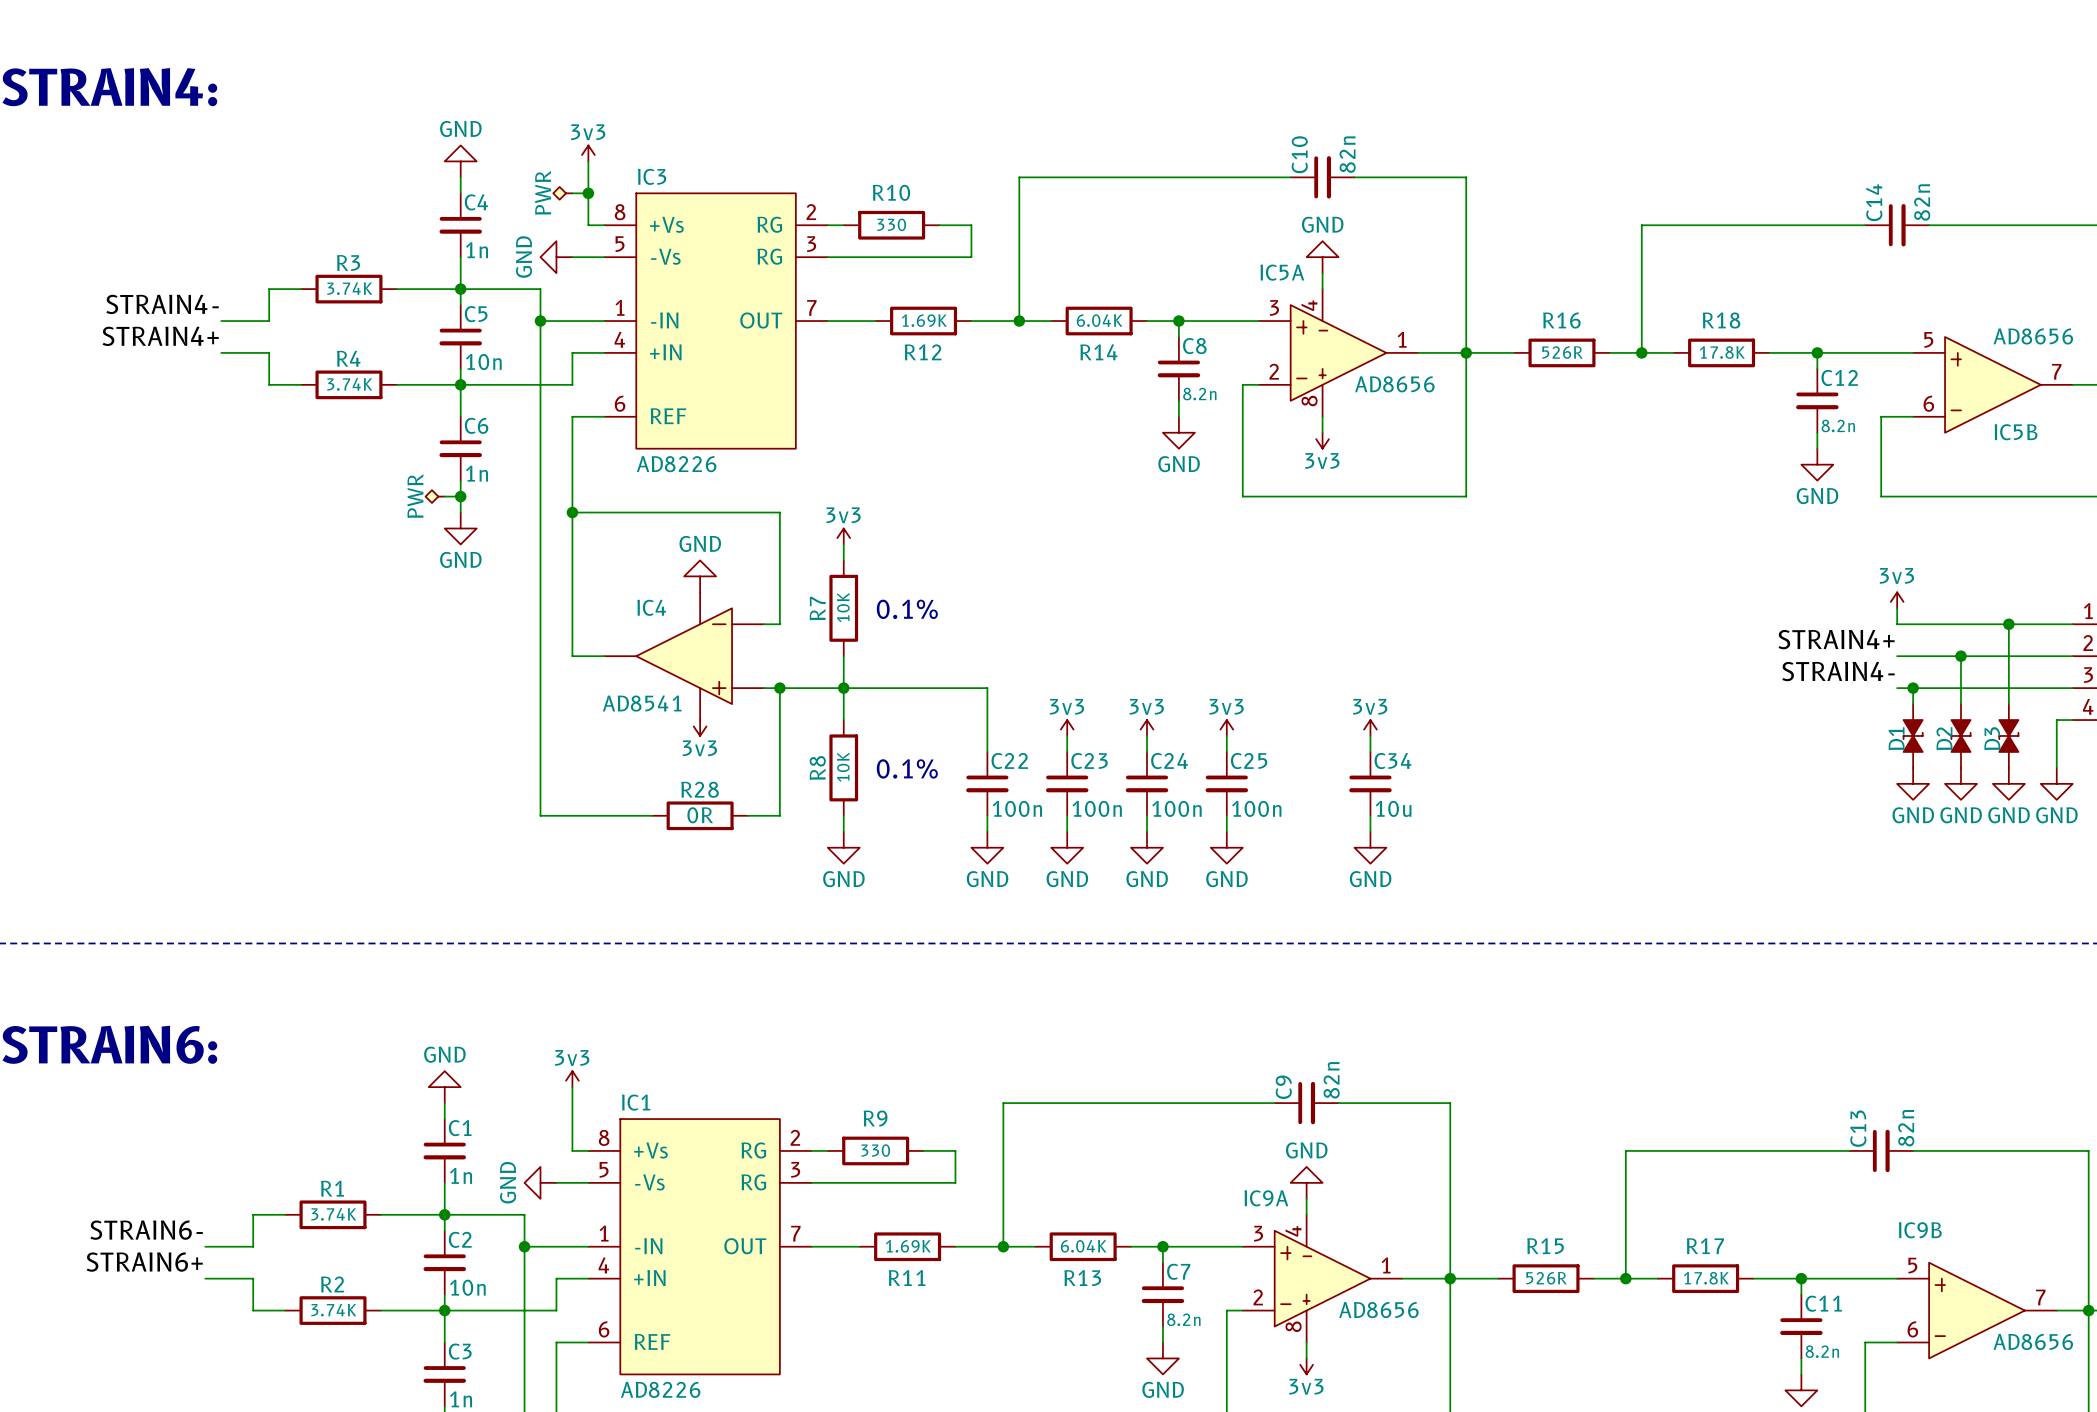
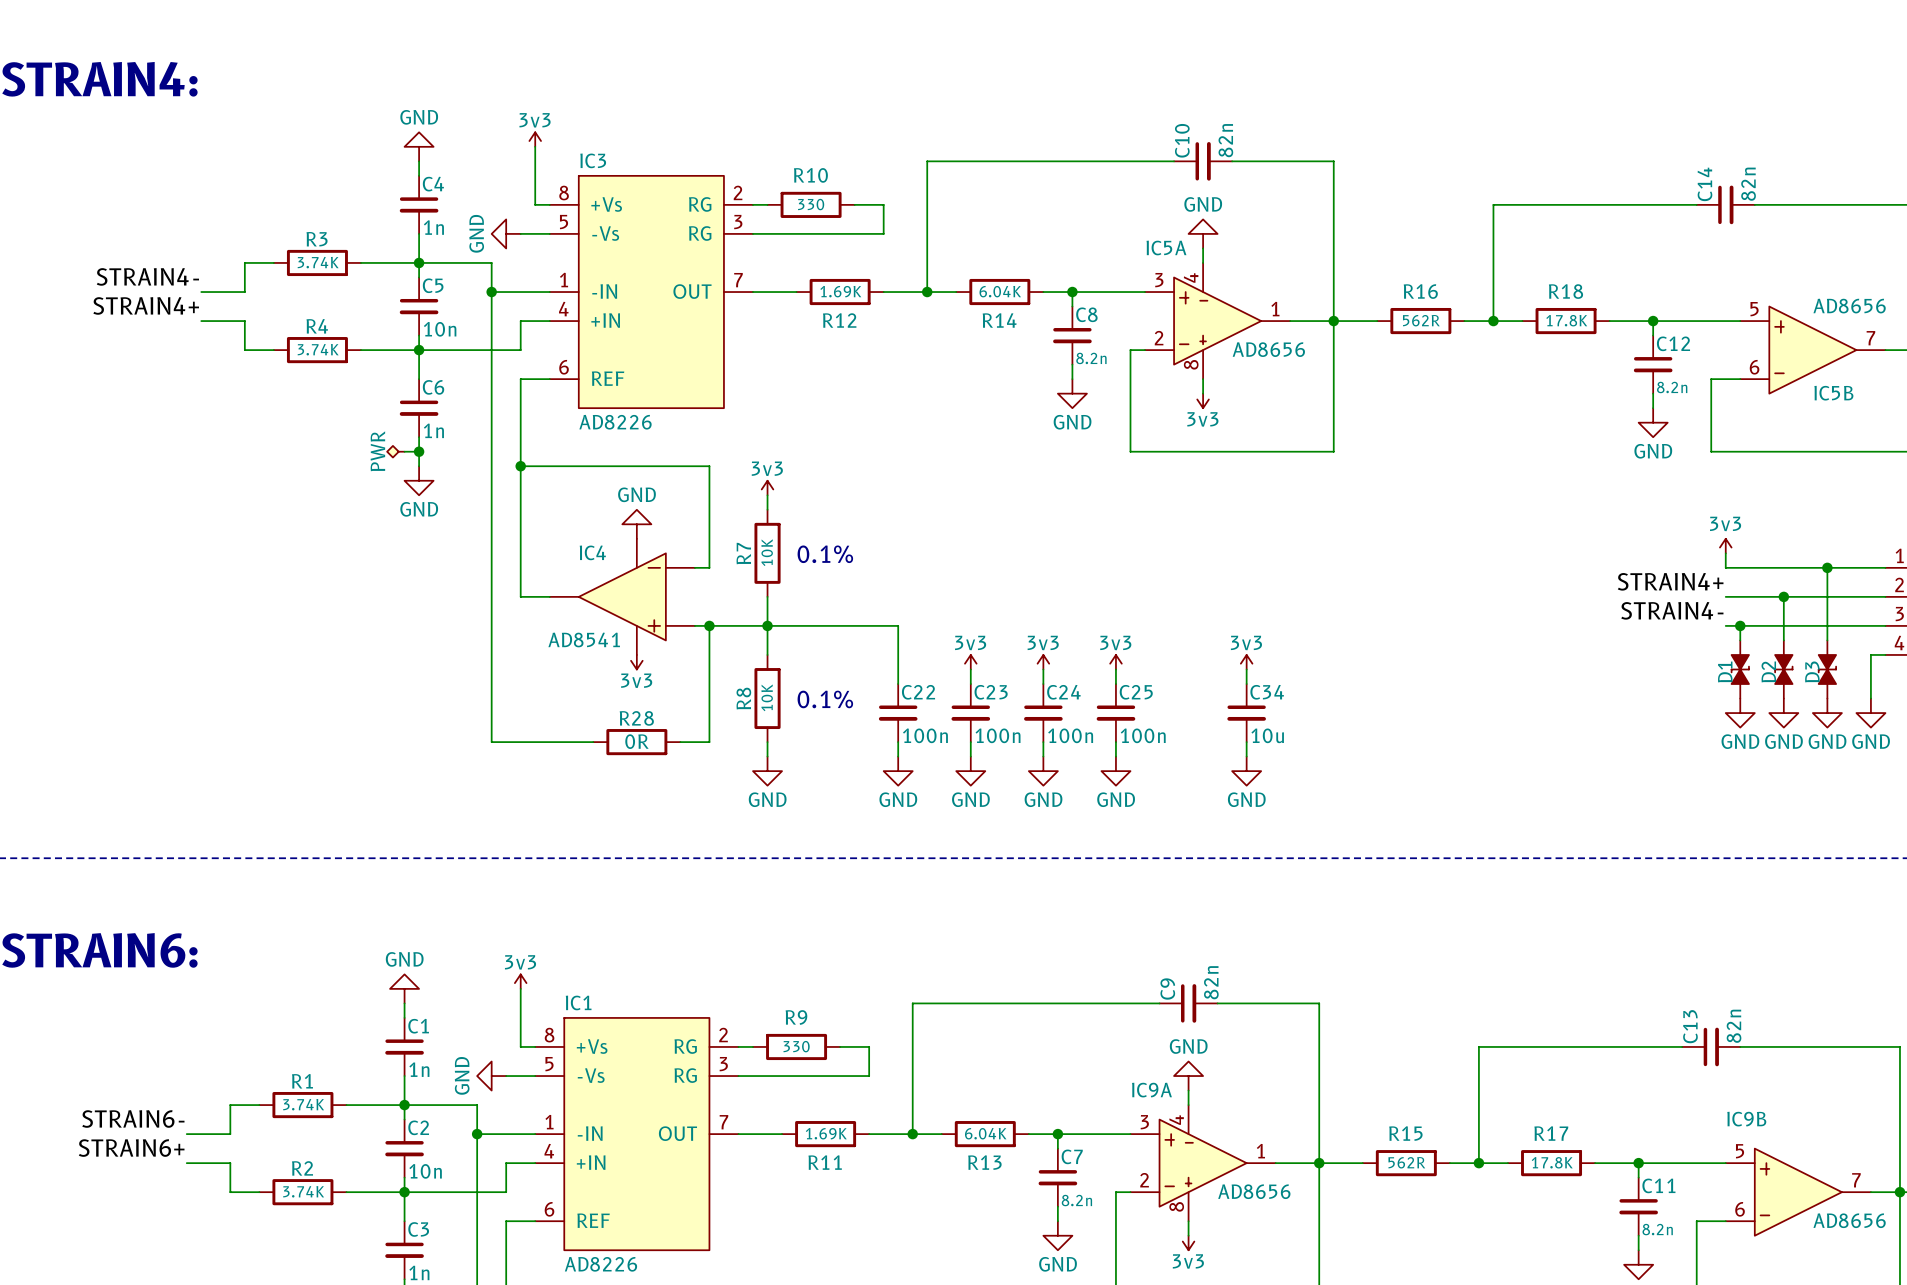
power symbol: PWR (562, 193) -> none
wire: (572, 193) (588, 193) -> none
junction: (588, 193) -> none
R16 value: 526R (1562, 352) -> 562R (1421, 320)
R15 value: 526R (1546, 1278) -> 562R (1406, 1162)

